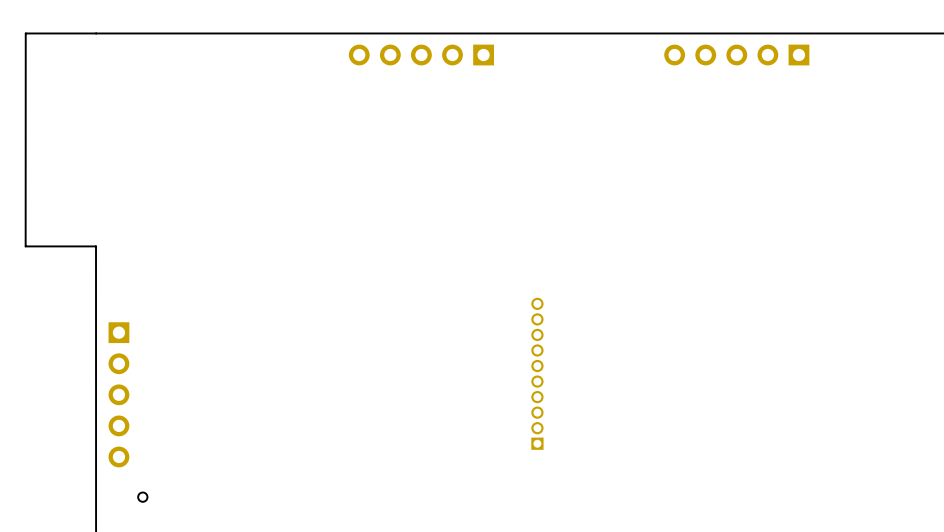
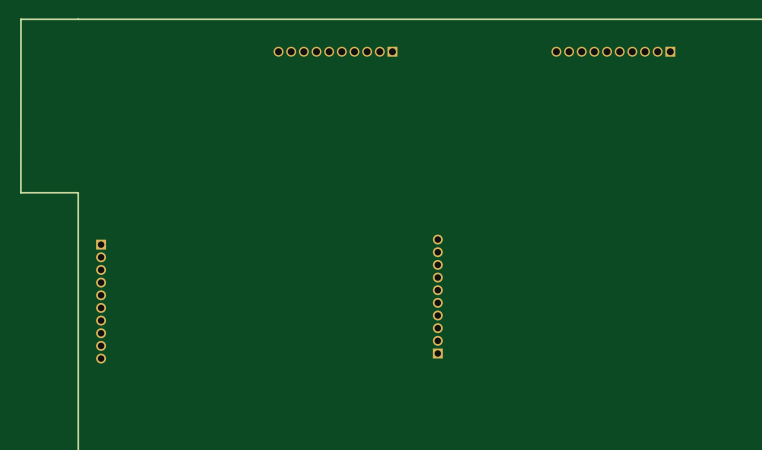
part: (421, 55) -> none
part: (736, 55) -> none
part: none -> (335, 51)
part: none -> (613, 51)
part: none -> (101, 301)
part: (118, 394) -> none
part: (142, 497) -> none

